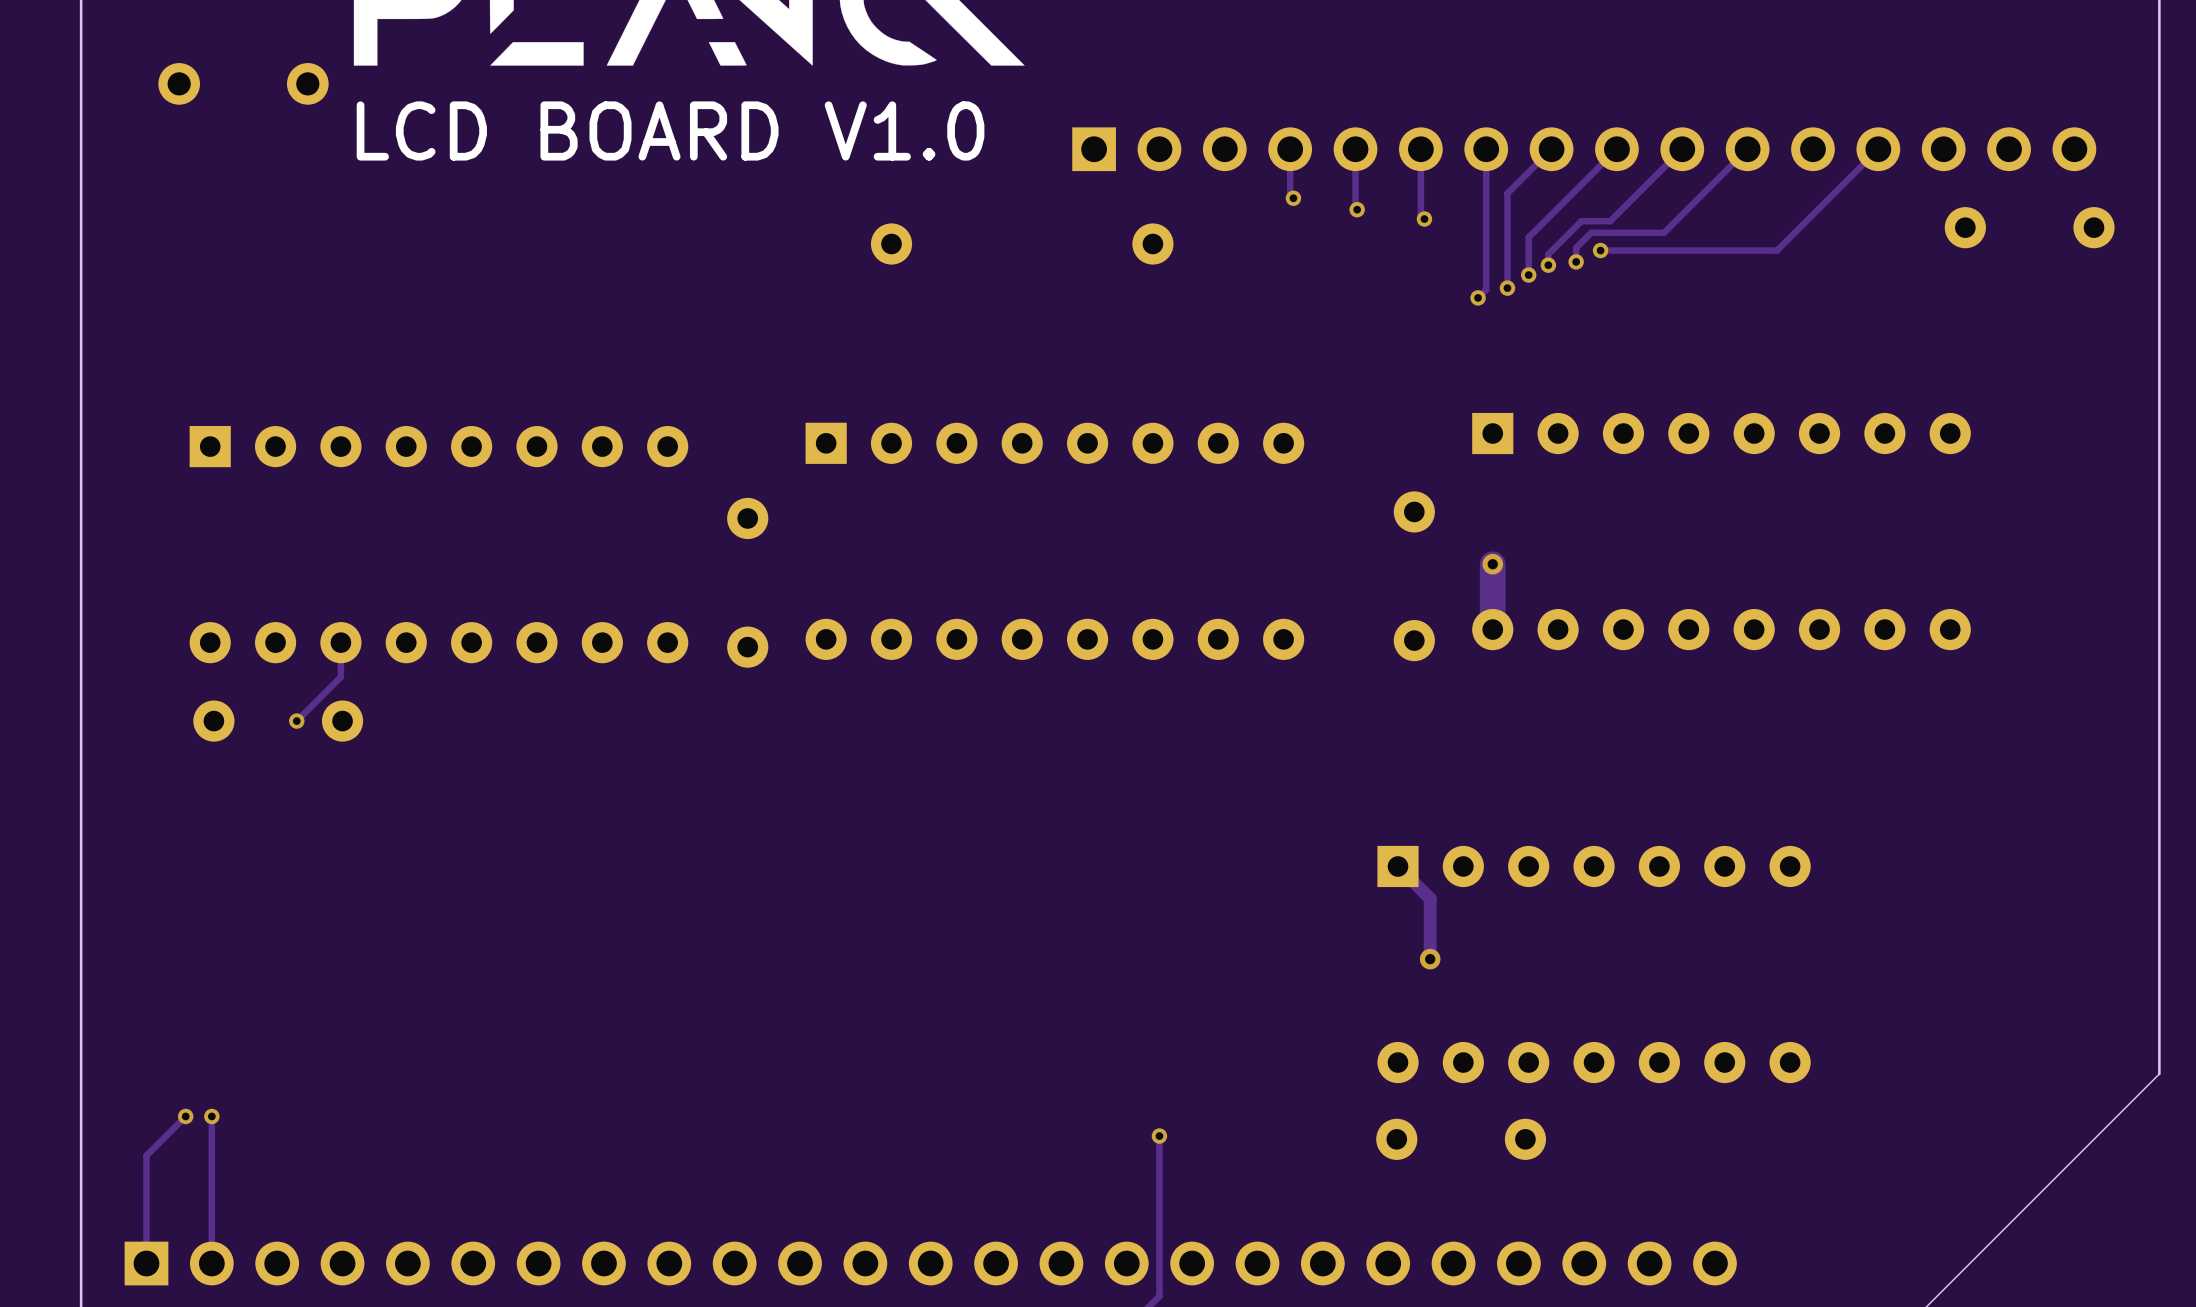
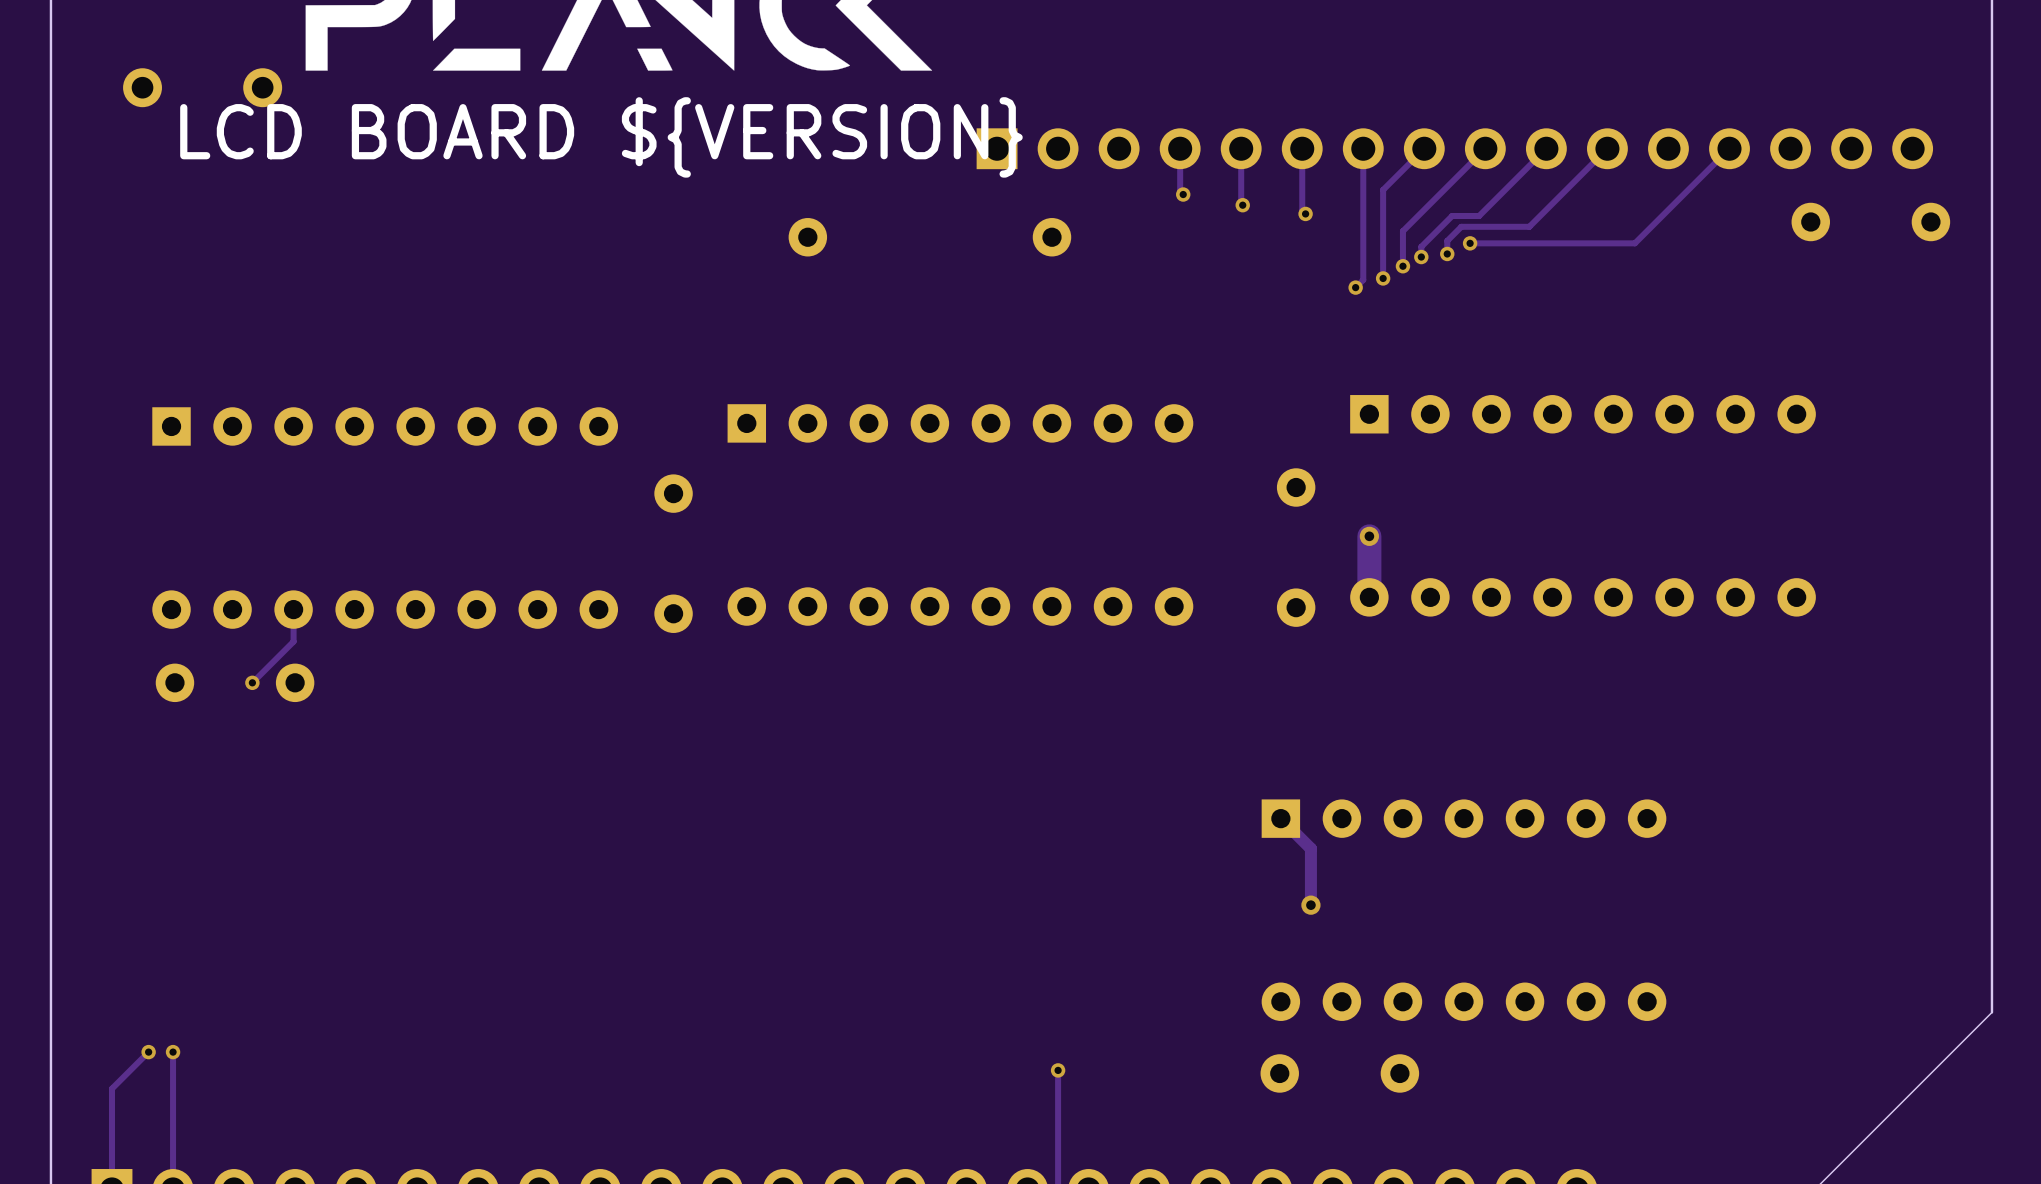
text: LCD BOARD V1.0 (670, 130) -> LCD BOARD ${VERSION} (601, 137)

